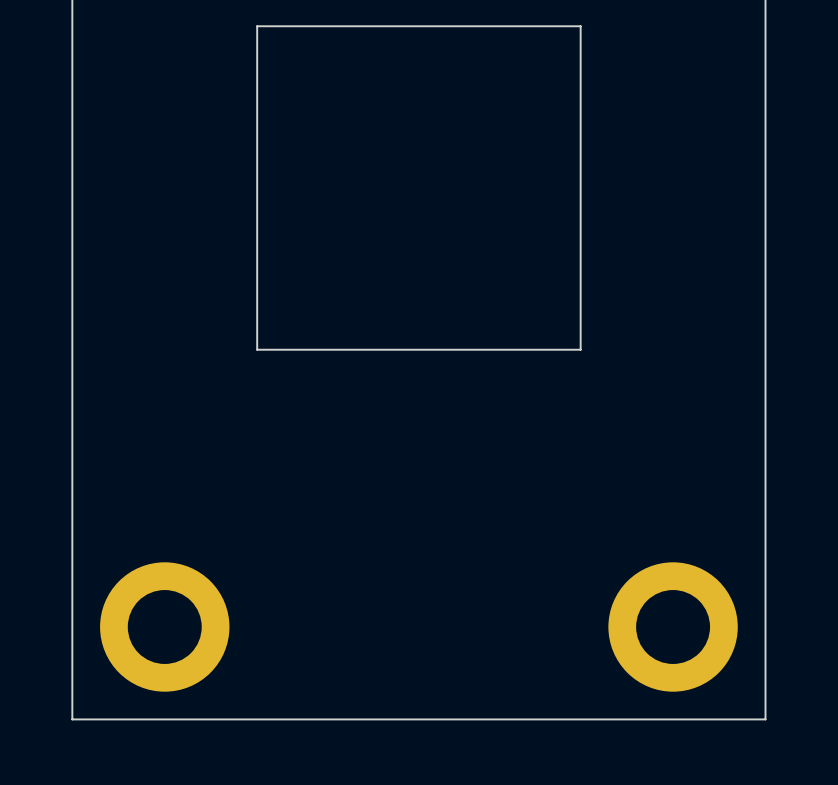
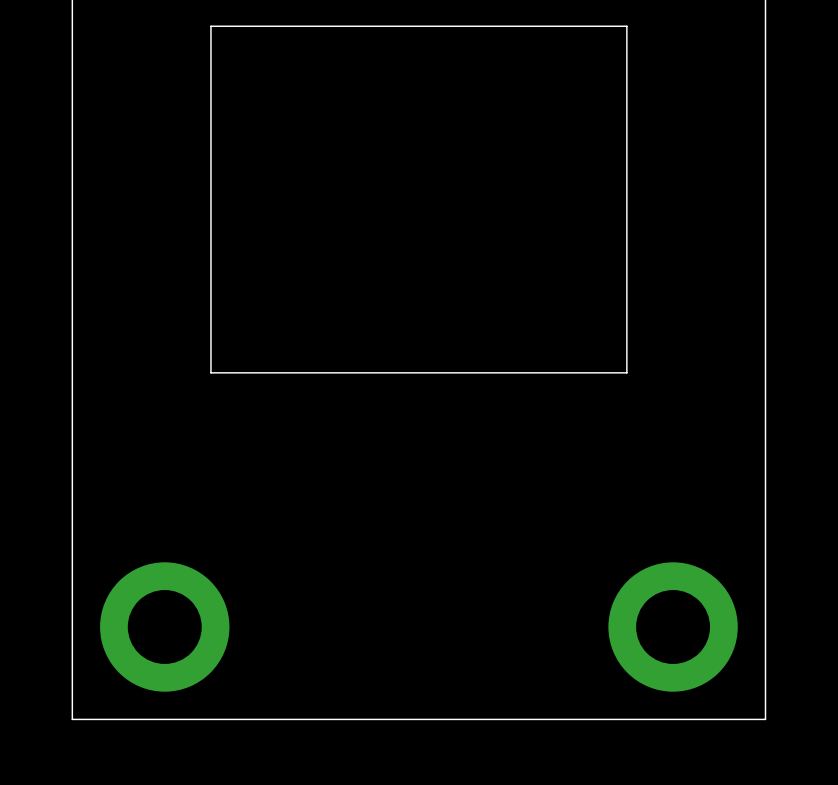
board edge: (580, 26) (580, 349) (257, 349) (257, 26) -> (580, 26) (626, 26) (626, 372) (210, 372) (210, 26) (257, 26)

